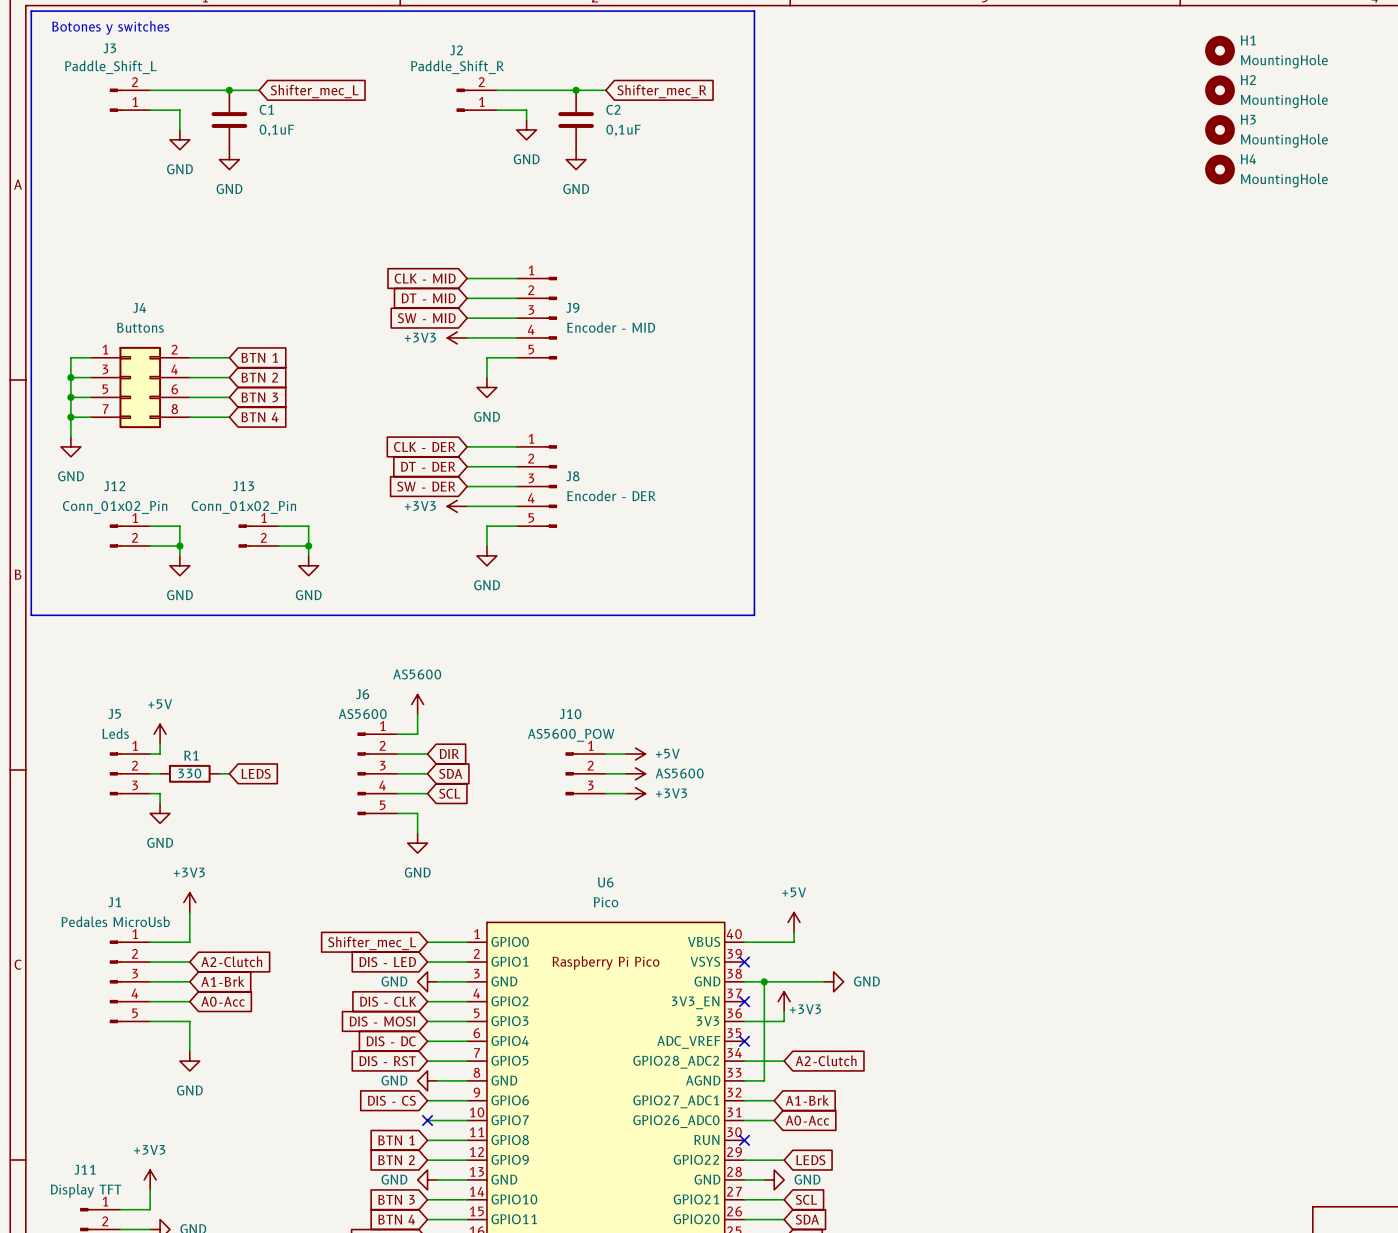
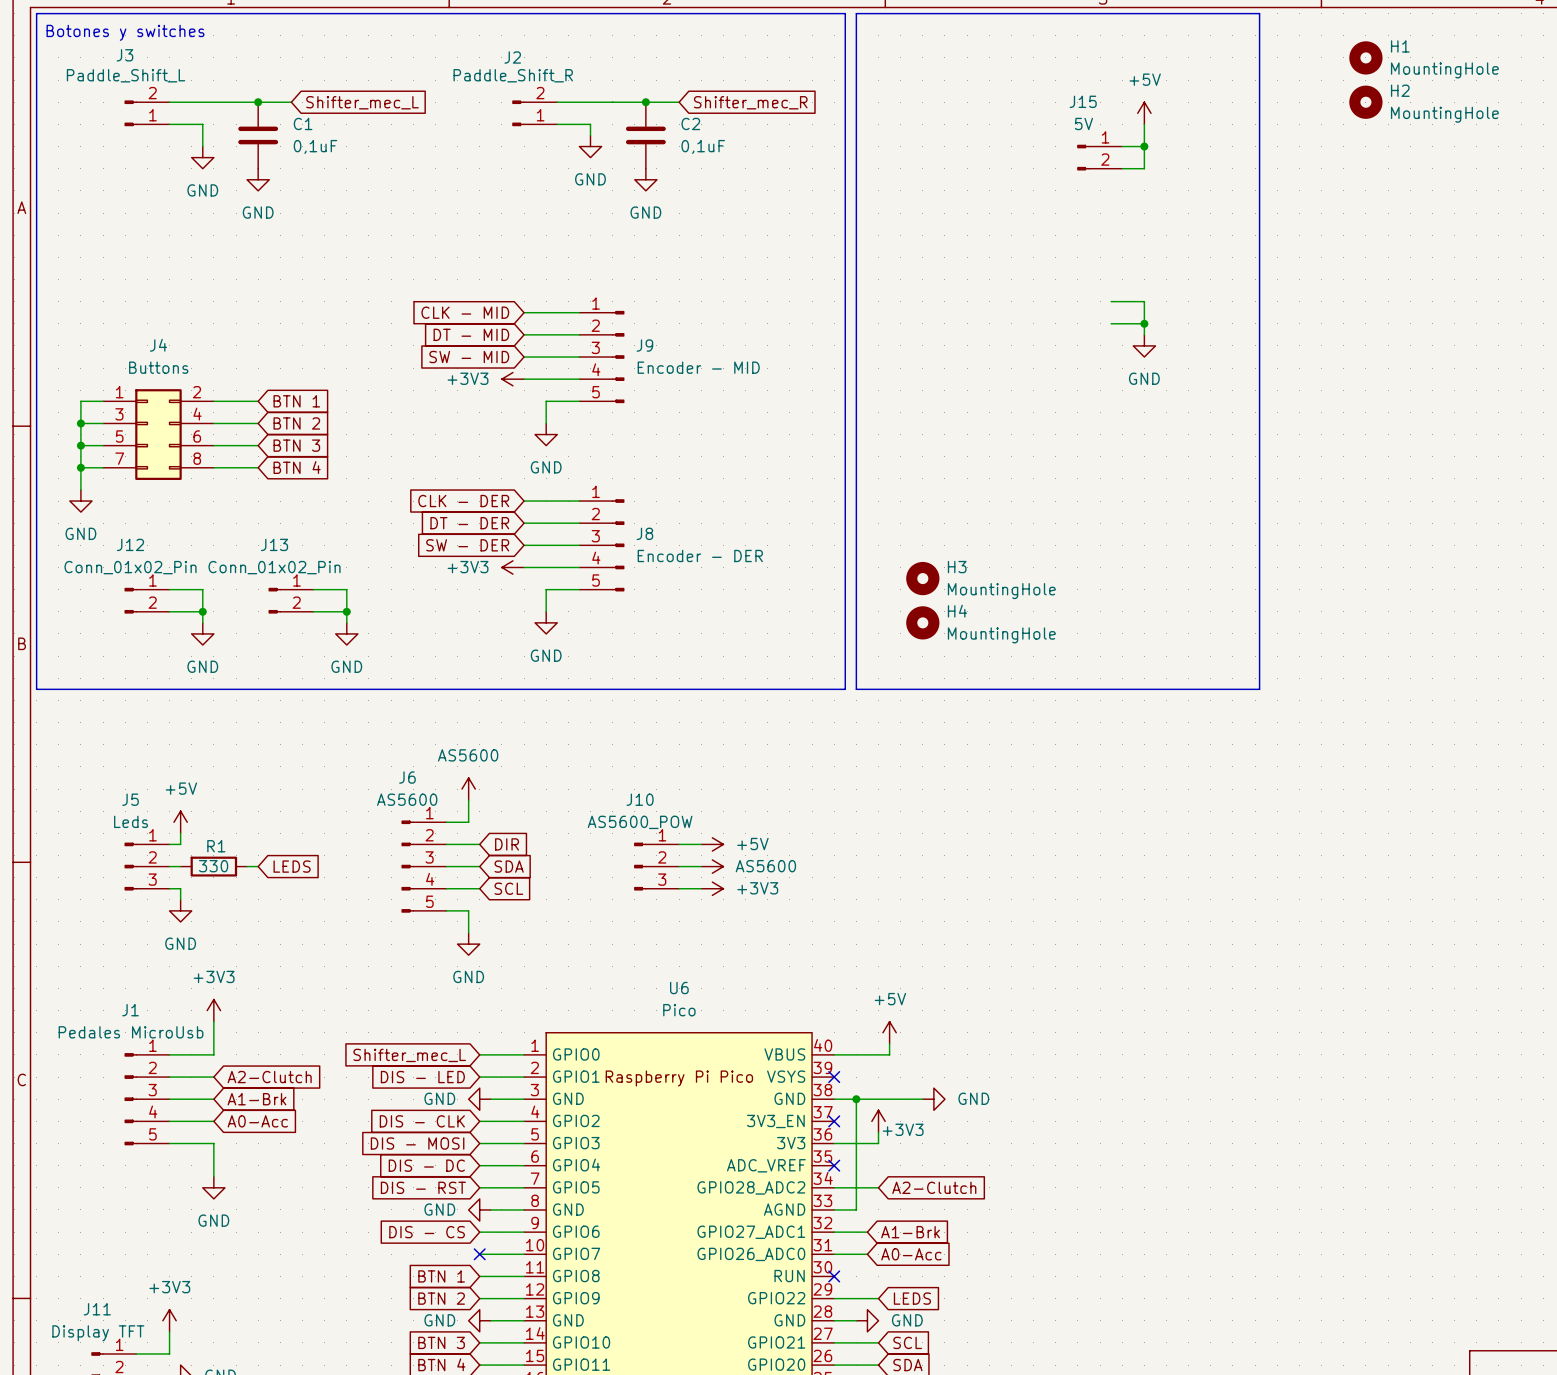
line: none -> (856, 13) (1259, 13) (1259, 689) (856, 689) (856, 13)
power symbol: none -> +5V (1144, 113)
wire: none -> (1144, 124) (1144, 168) (1122, 168)
wire: none -> (1122, 146) (1144, 146)
junction: none -> (1144, 146)
H3 position: (1220, 129) -> (922, 578)
J15: none -> 5V (1099, 157)
H4 position: (1220, 169) -> (922, 622)
wire: none -> (1111, 301) (1144, 301) (1144, 334)
wire: none -> (1111, 323) (1144, 323)
junction: none -> (1144, 323)
power symbol: none -> GND (1144, 345)

